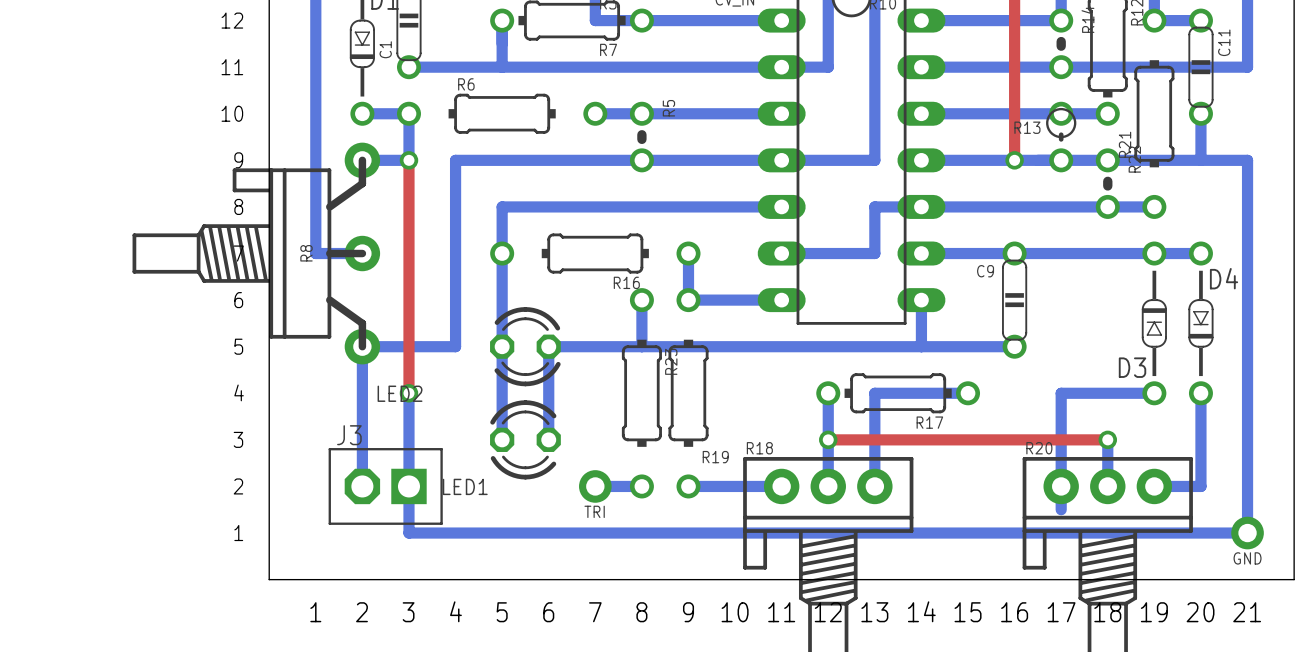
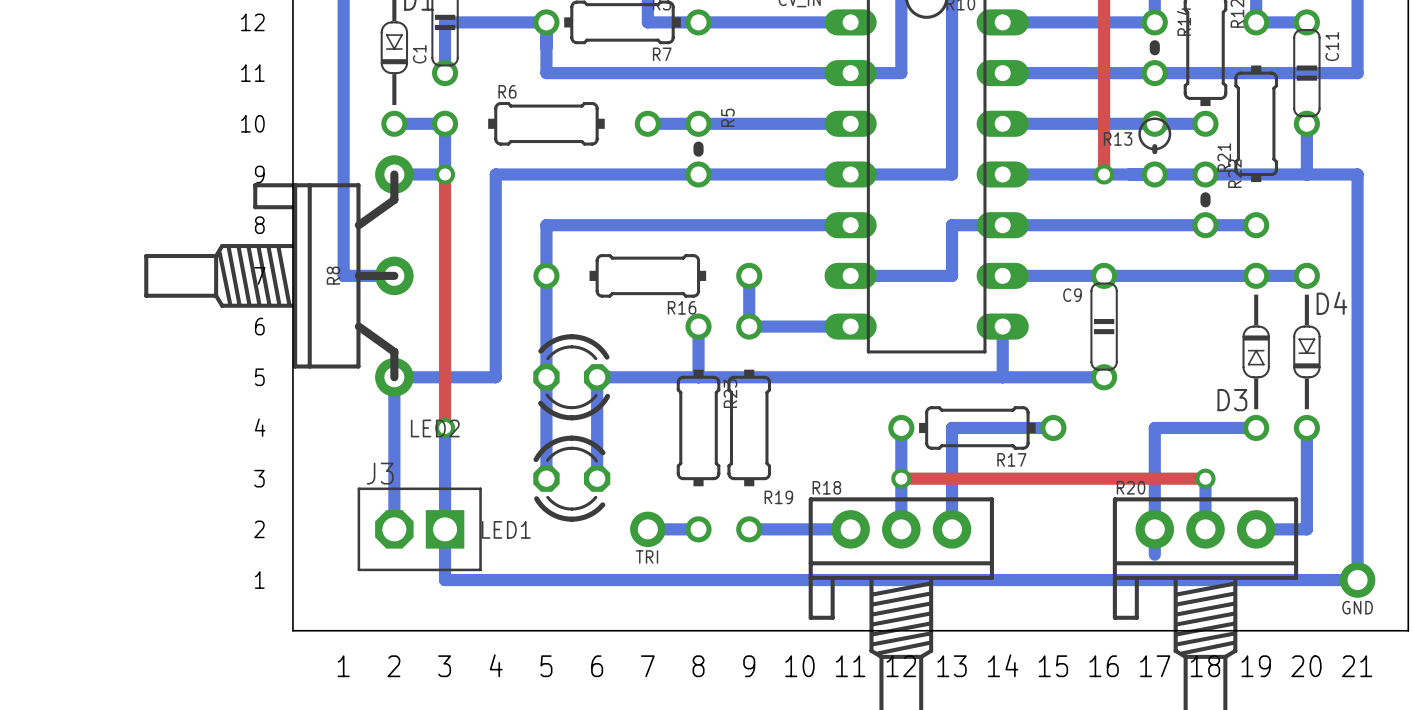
bottom track: (408, 67) (502, 67) -> (445, 73) (445, 22) (546, 22)

